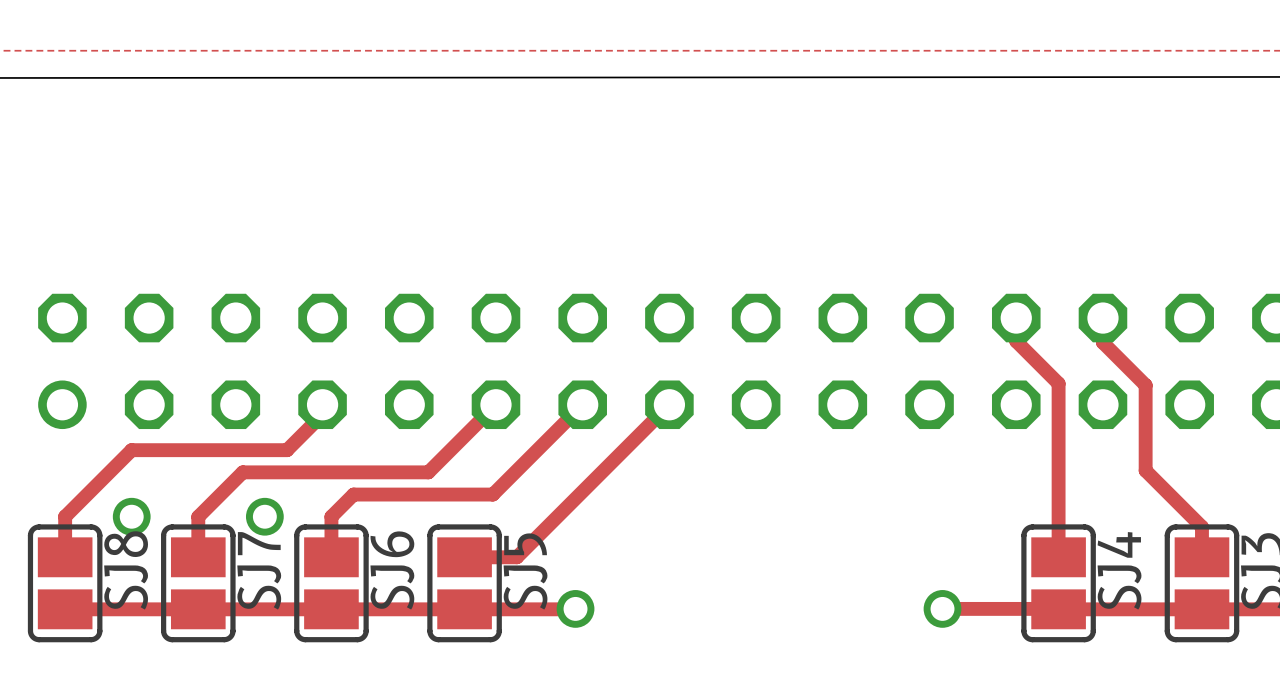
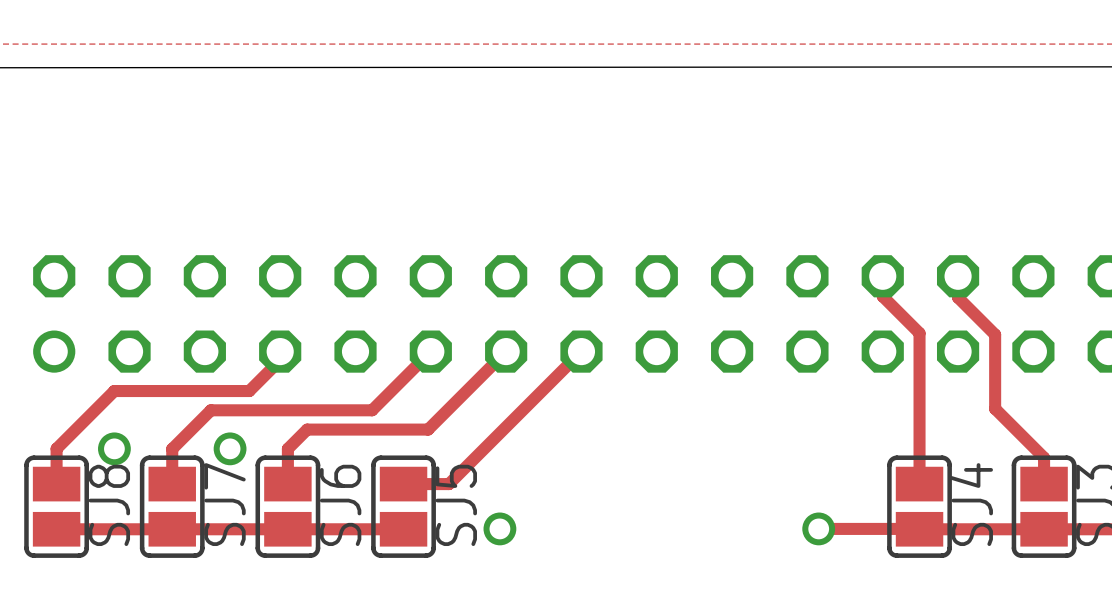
track: (464, 609) (575, 609) -> none

